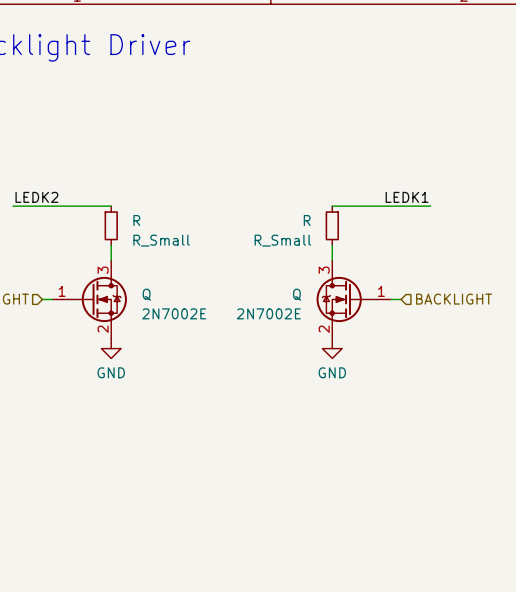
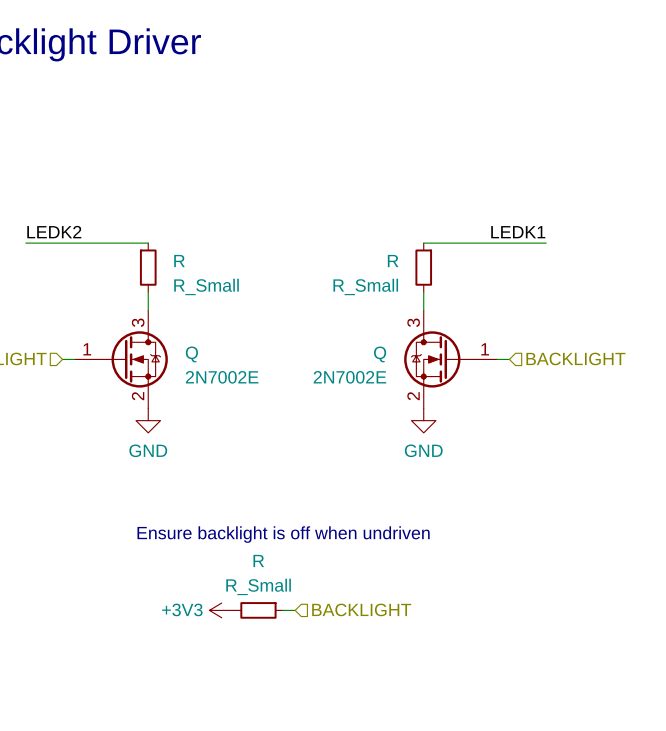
text: none -> Ensure backlight is off when undriven (283, 534)
power symbol: none -> +3V3 (221, 610)
R: none -> R_Small (258, 610)
wire: none -> (282, 610) (295, 610)
hierarchical label: none -> BACKLIGHT (361, 609)

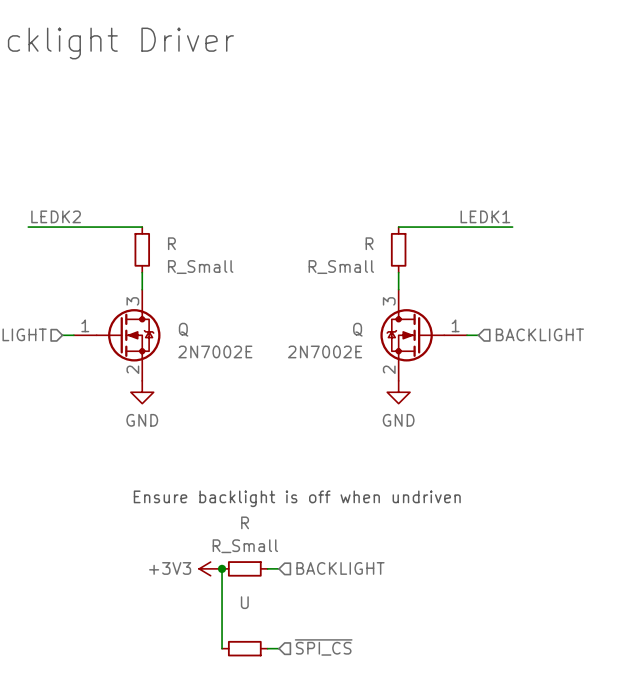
wire: none -> (222, 568) (222, 648)
junction: none -> (222, 568)
U: none -> (244, 648)
wire: none -> (267, 648) (279, 648)
hierarchical label: none -> ~{SPI_CS} (323, 647)

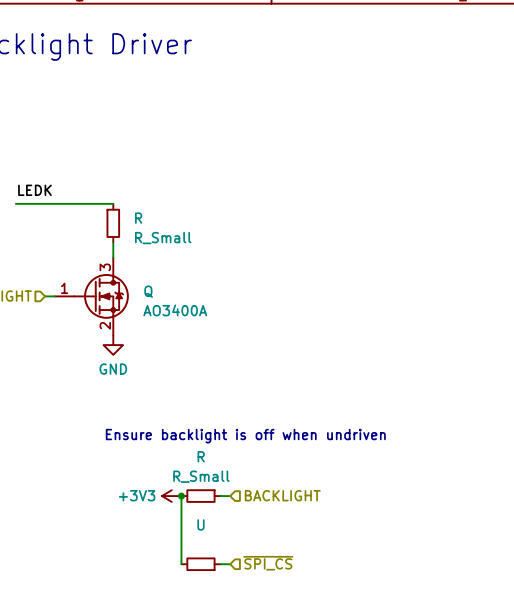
label: LEDK2 (56, 216) -> LEDK (34, 190)
label: LEDK1 (485, 216) -> none
wire: (398, 227) (512, 227) -> none
R: R_Small (398, 249) -> none
wire: (398, 272) (398, 289) -> none
hierarchical label: BACKLIGHT (539, 334) -> none
Q: 2N7002E (423, 335) -> none
wire: (467, 335) (478, 335) -> none
Q value: 2N7002E (215, 351) -> AO3400A (175, 310)
power symbol: GND (398, 392) -> none

